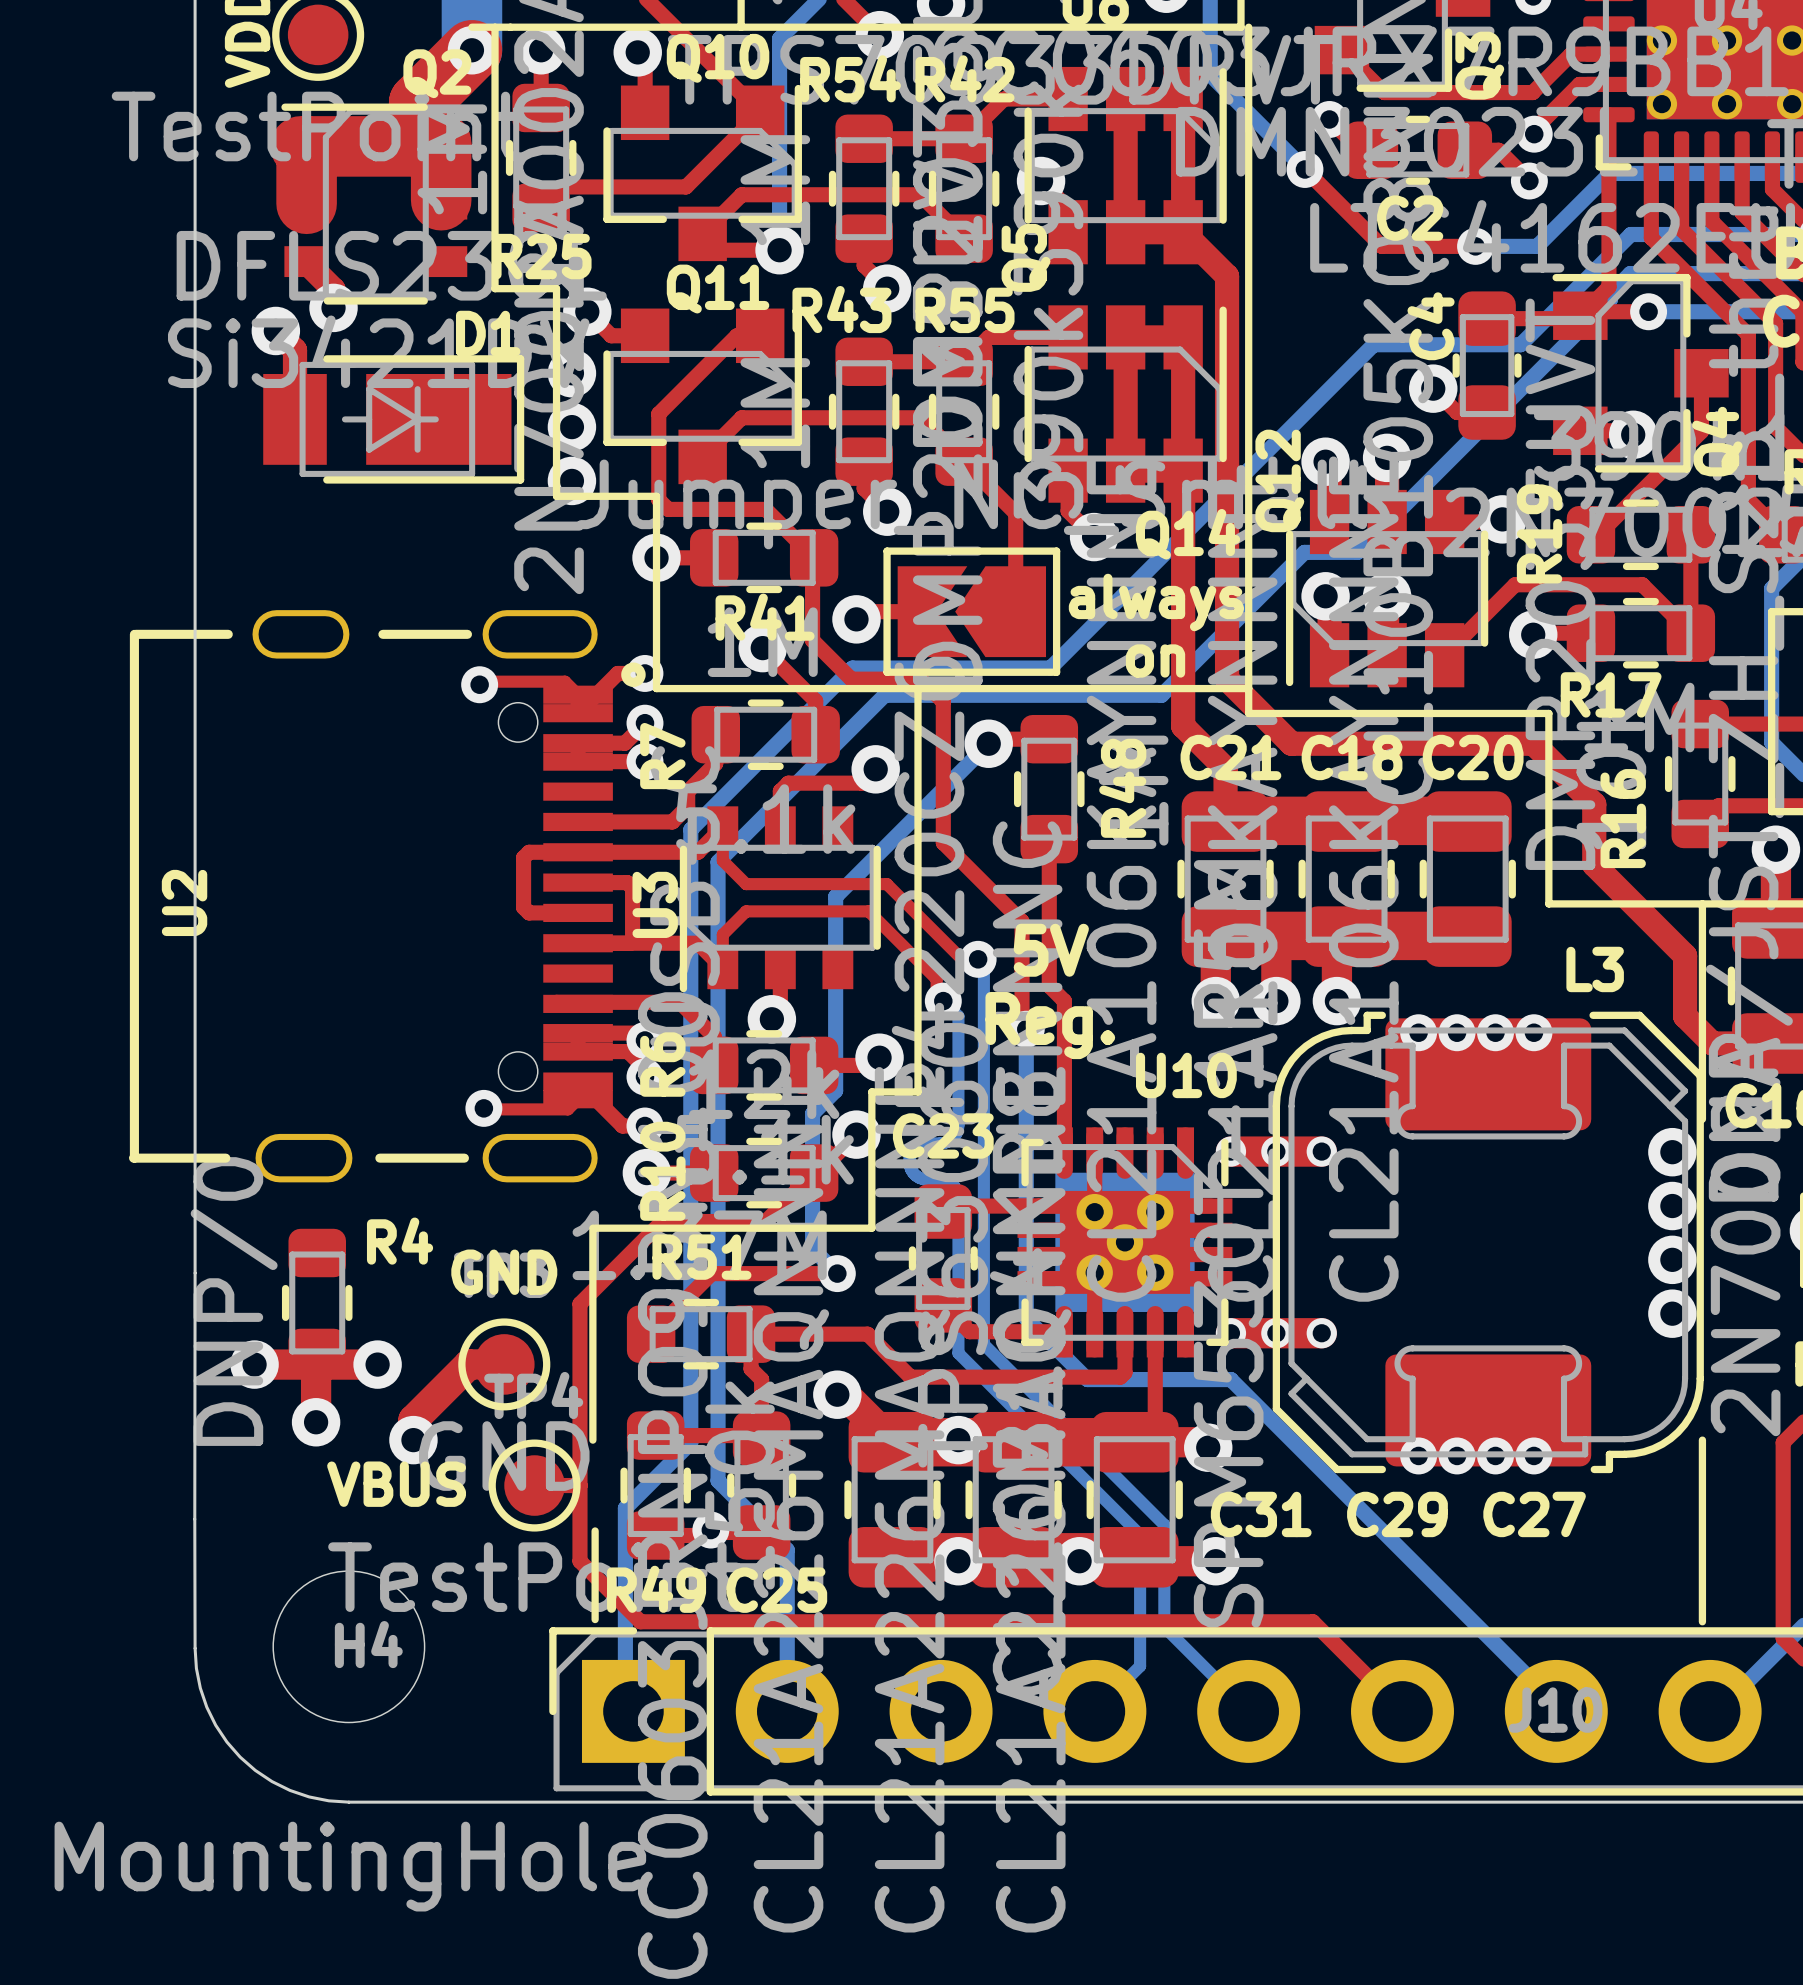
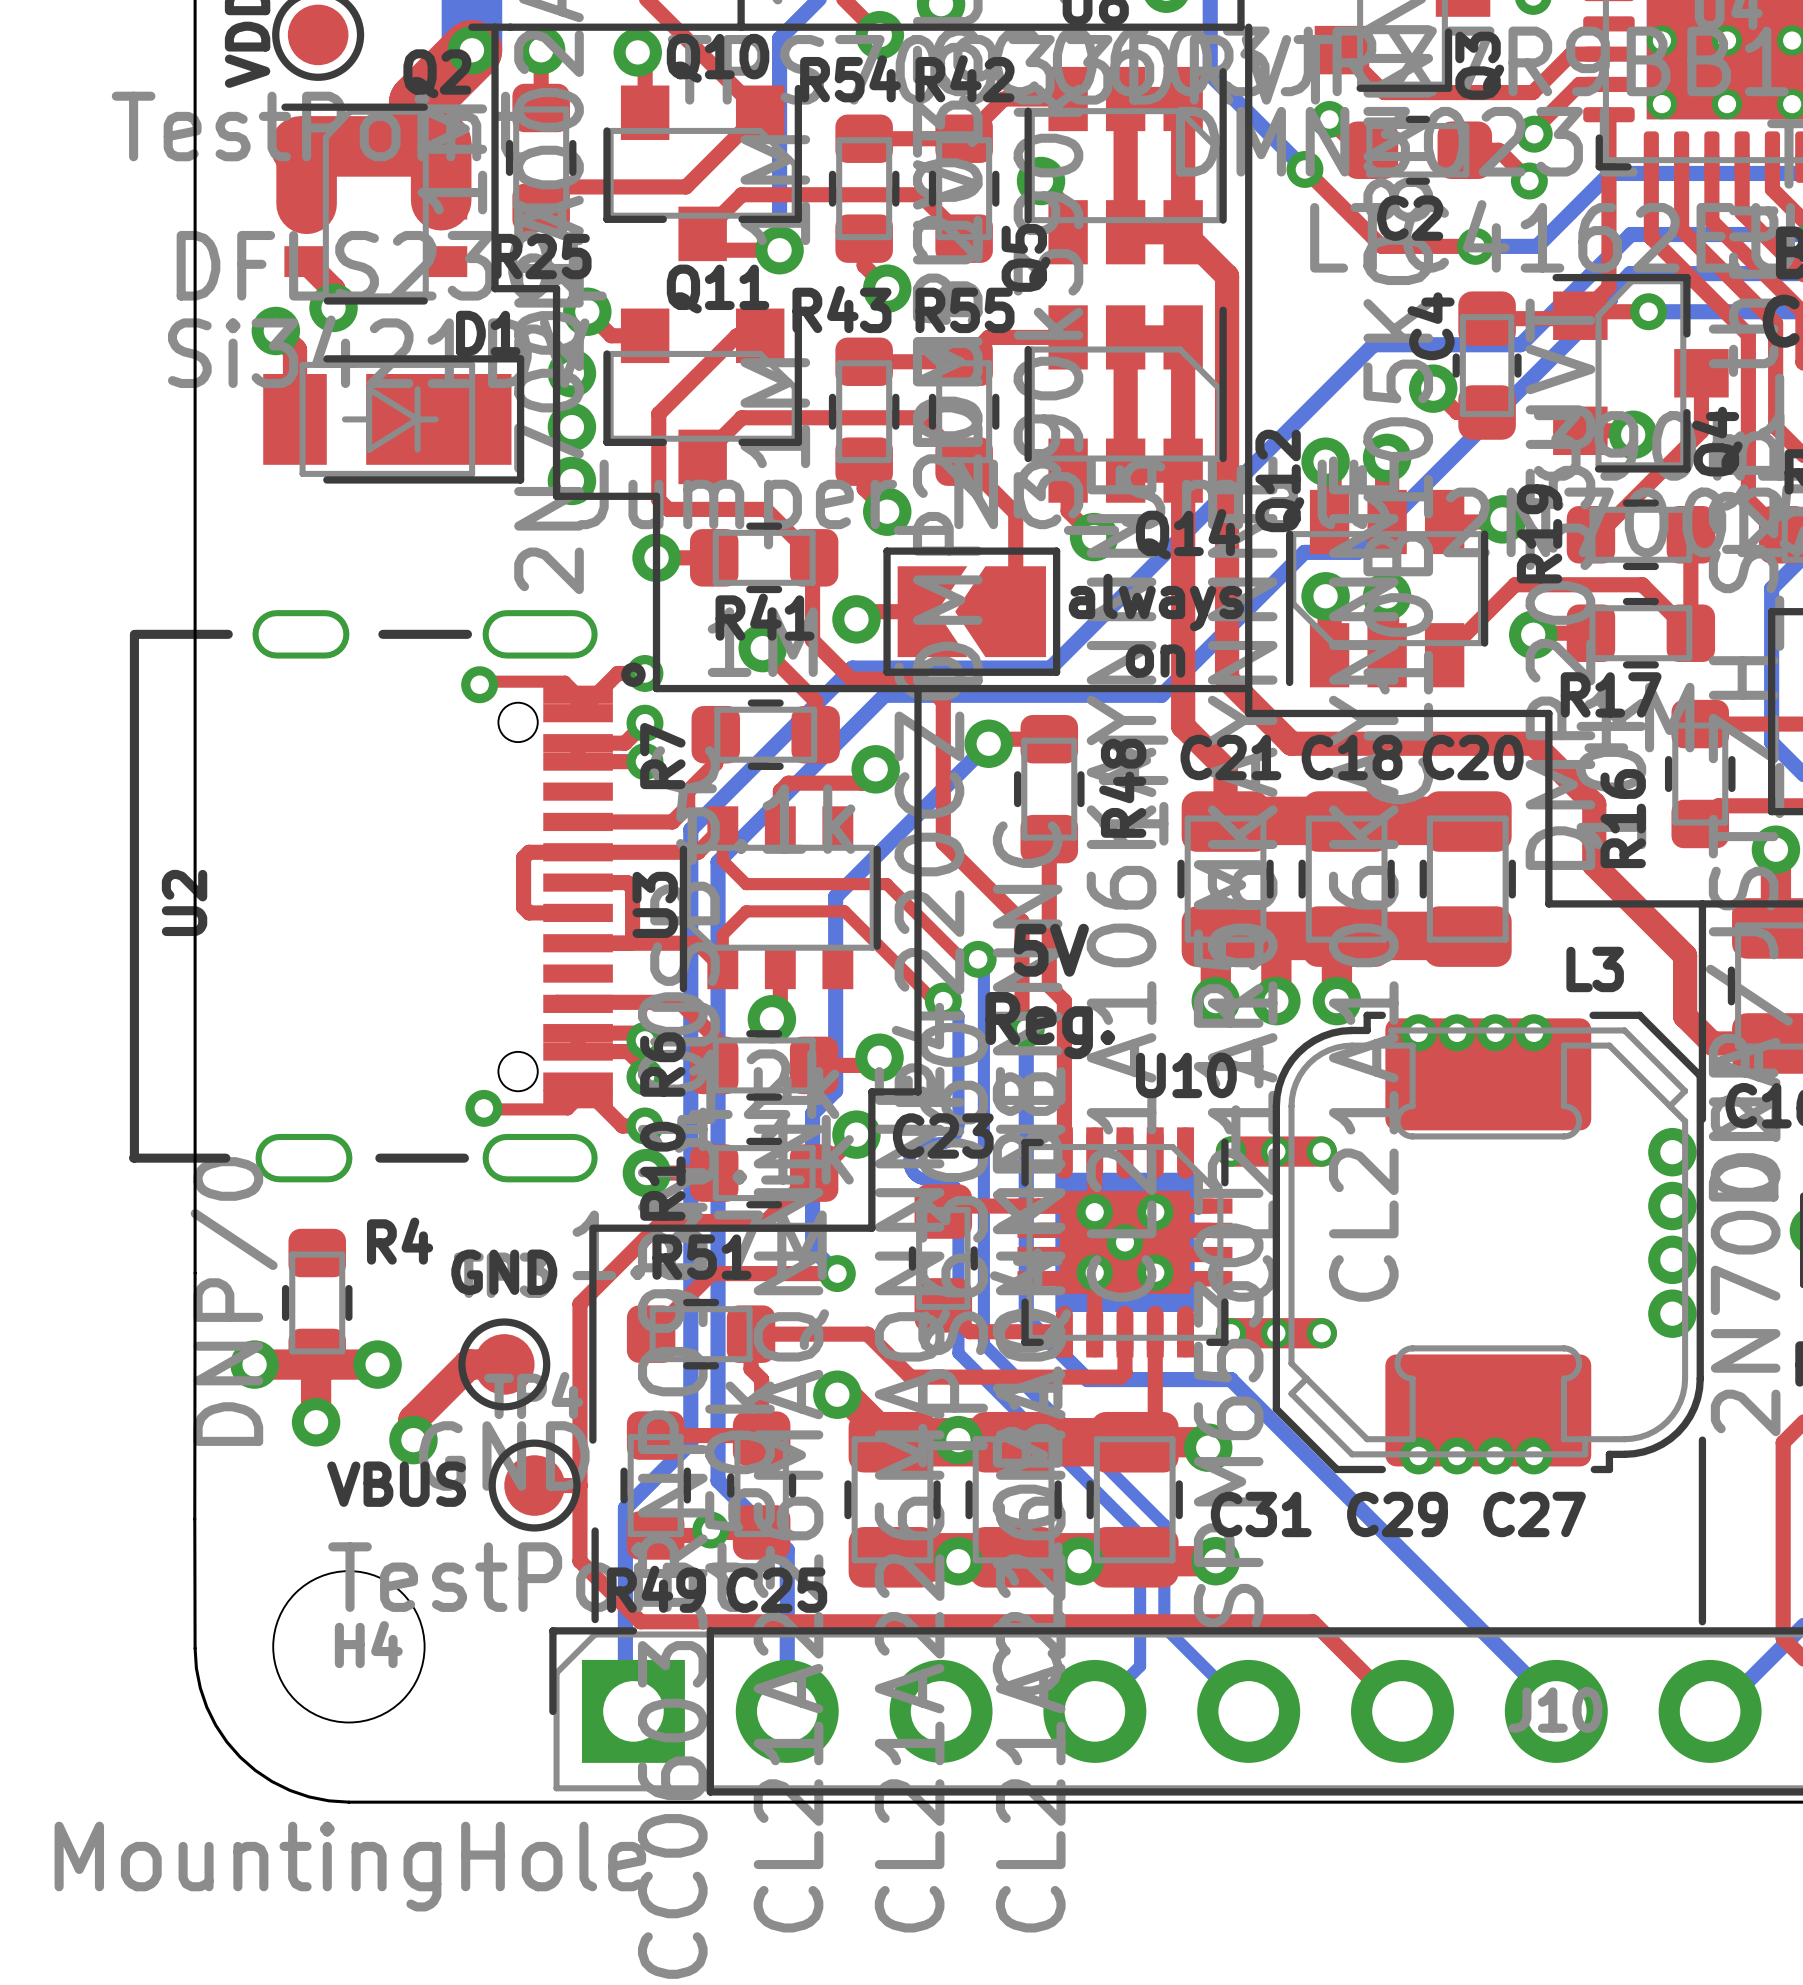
top track: (844, 911) (868, 911) (936, 979) (936, 1003) (943, 1001) -> (844, 911) (936, 1003)

